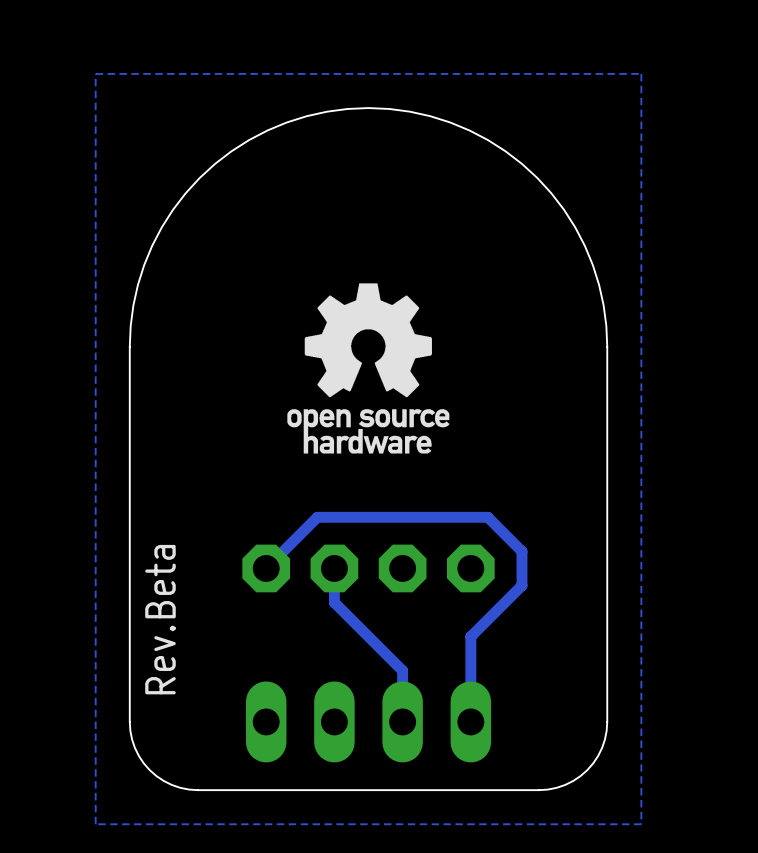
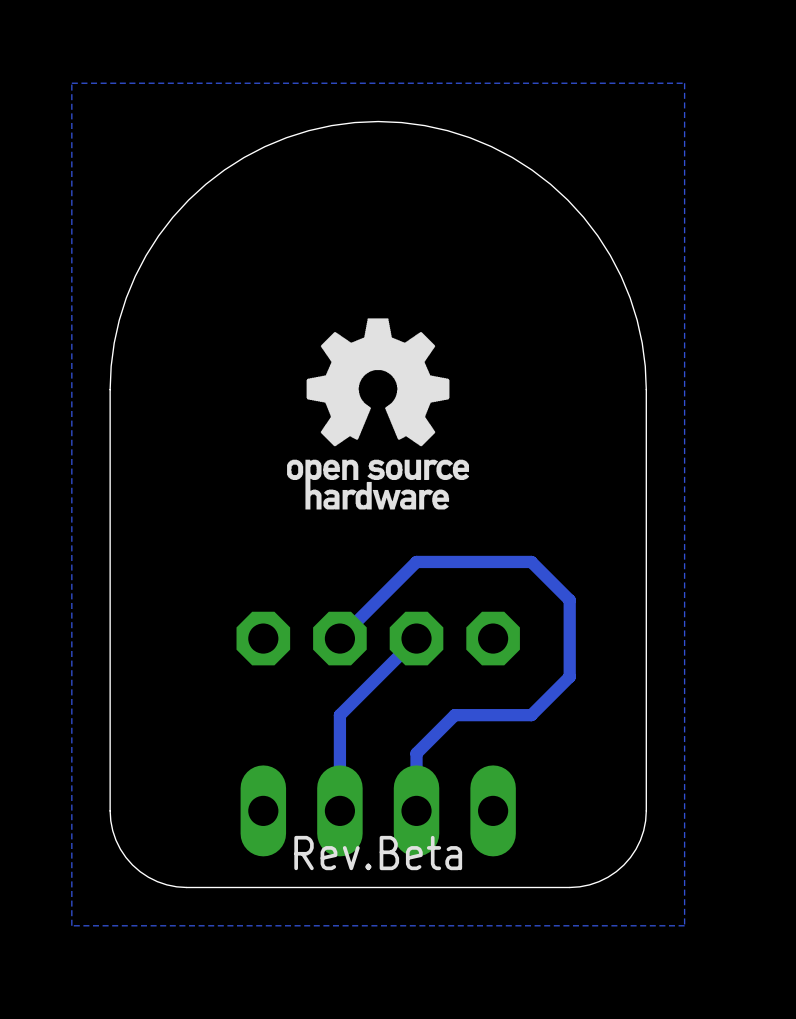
track: (266, 568) (317, 517) (487, 517) (521, 551) (521, 585) (470, 636) (470, 721) -> none
track: (334, 568) (334, 602) (402, 670) -> (339, 638) (416, 561) (531, 561) (569, 600) (569, 676) (531, 715) (454, 715) (416, 753)
track: none -> (416, 638) (339, 715) (339, 810)
text rotation: 0° (160, 619) -> 90° clockwise (378, 853)
text position: Rev.Beta (160, 619) -> Rev.Beta (378, 853)

